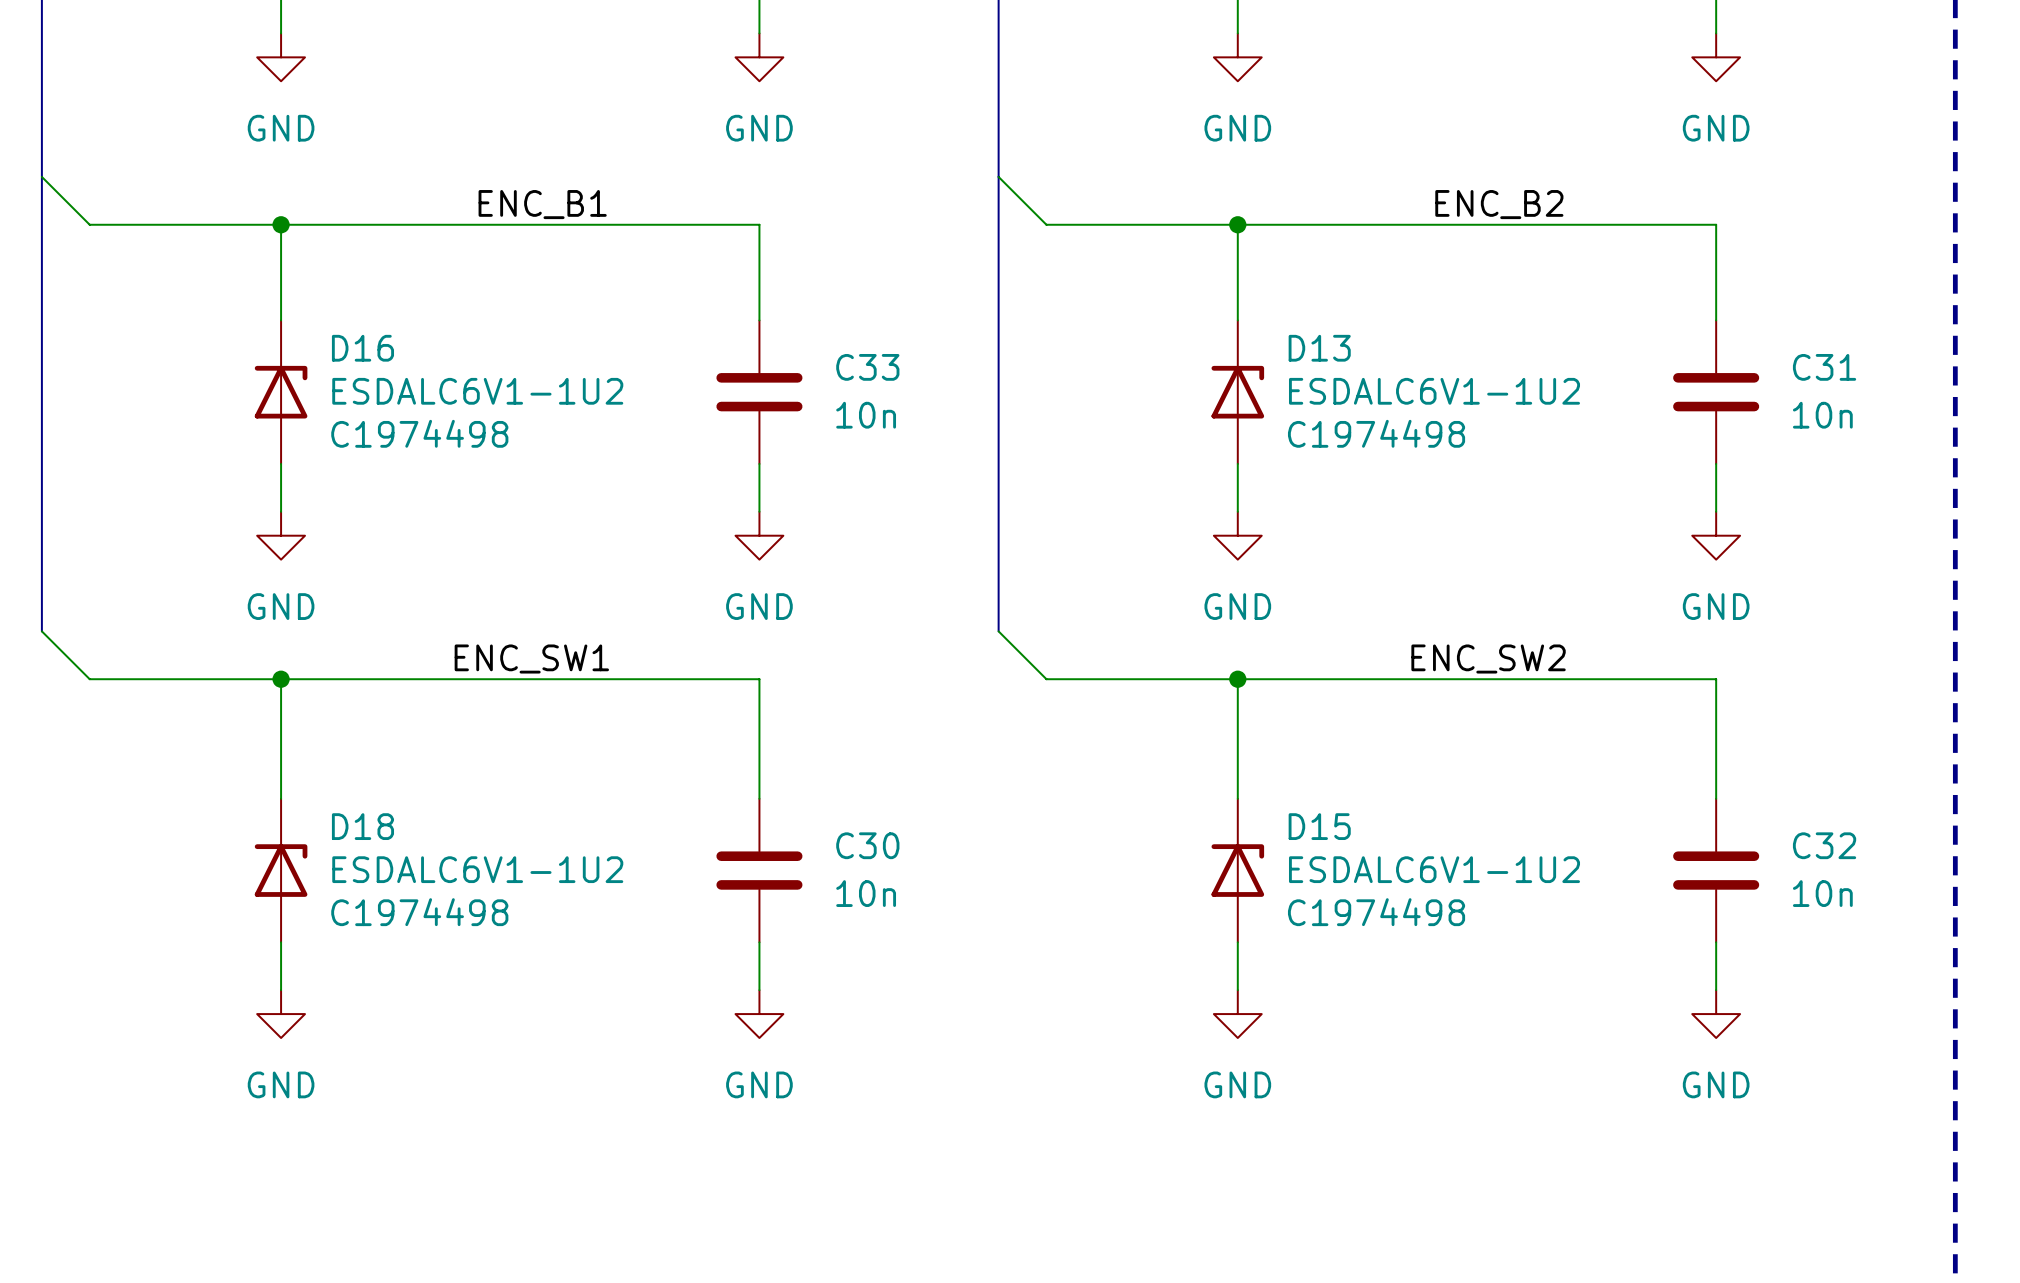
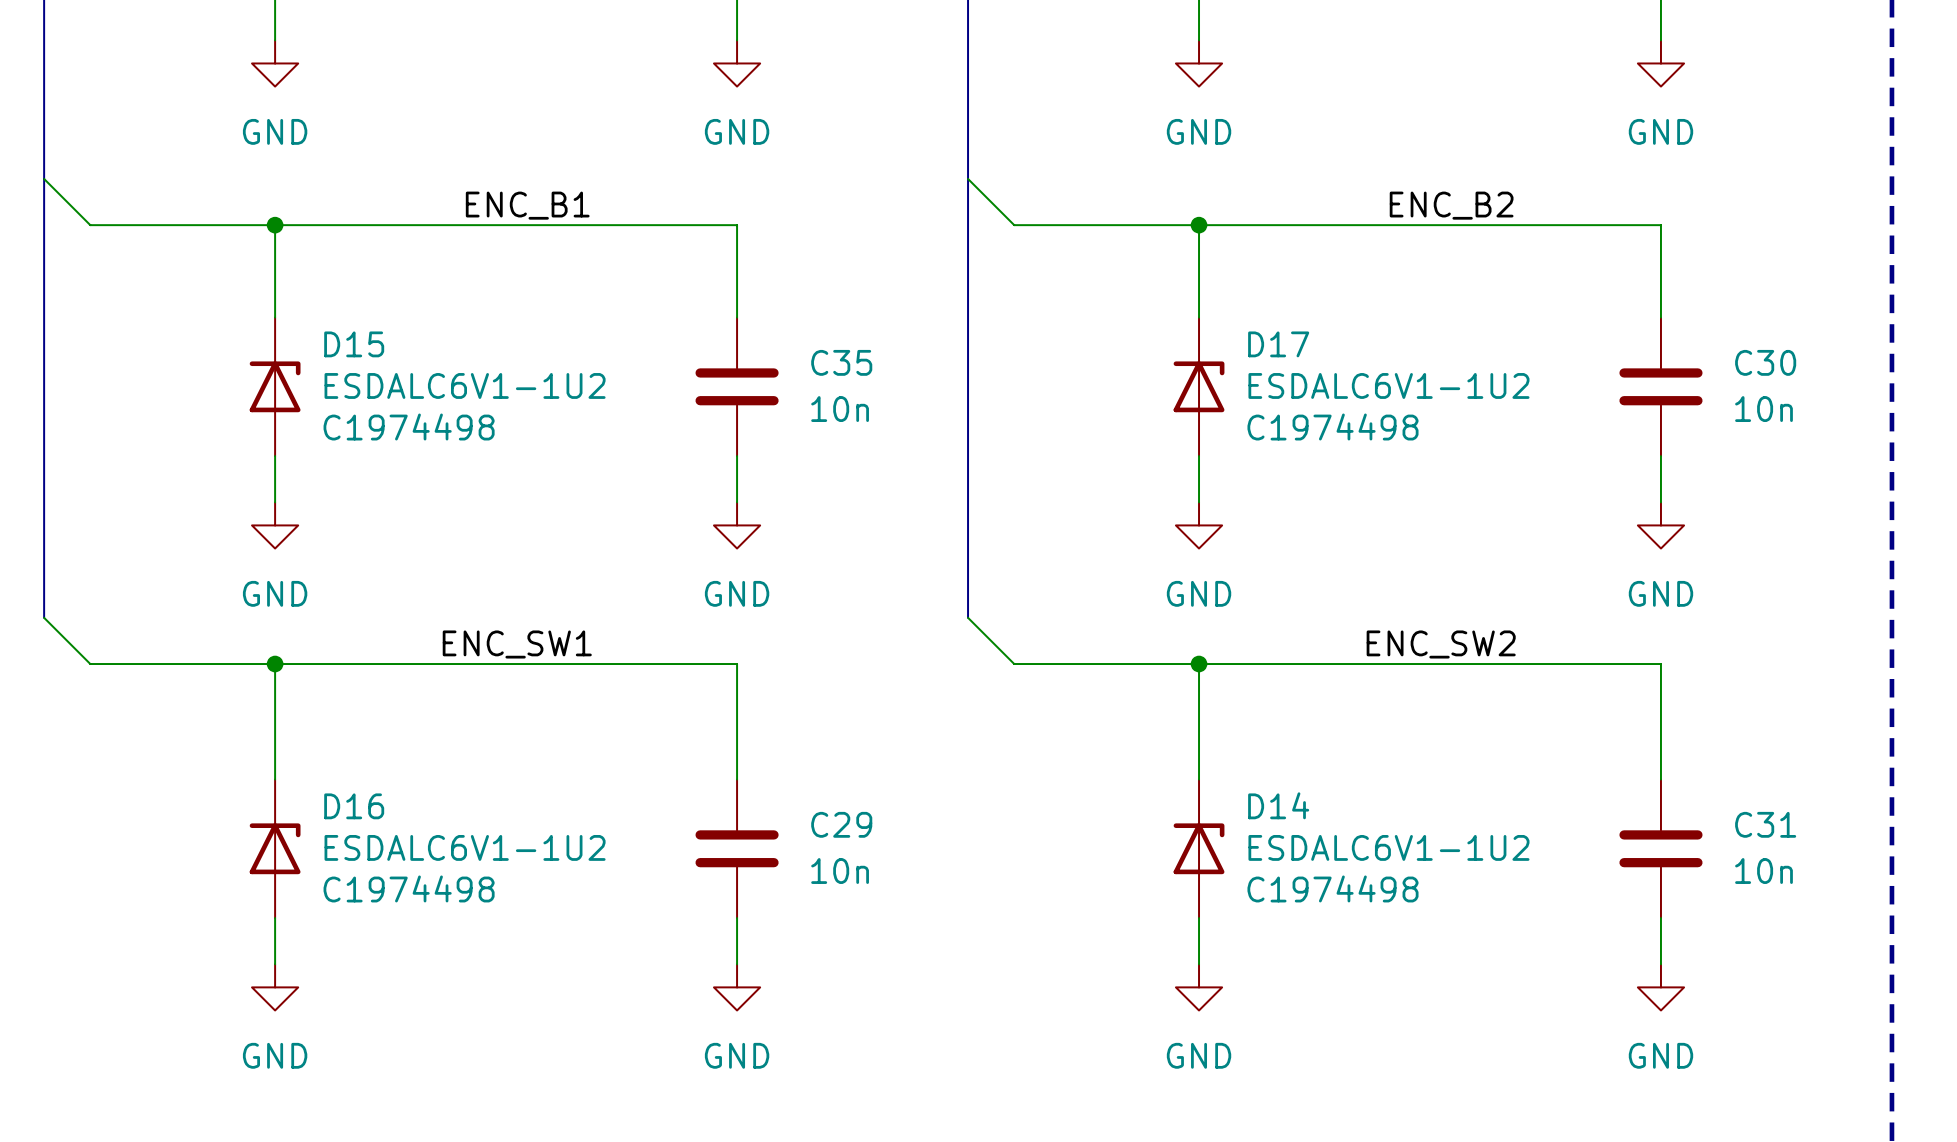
D16 name: D16 (362, 348) -> D15 (354, 344)
D13 name: D13 (1319, 348) -> D17 (1278, 344)
C33 name: C33 (867, 367) -> C35 (841, 362)
C31 name: C31 (1824, 367) -> C30 (1765, 362)
D18 name: D18 (362, 826) -> D16 (354, 806)
D15 name: D15 (1319, 826) -> D14 (1278, 805)
C30 name: C30 (867, 845) -> C29 (841, 824)
C32 name: C32 (1824, 845) -> C31 (1765, 824)

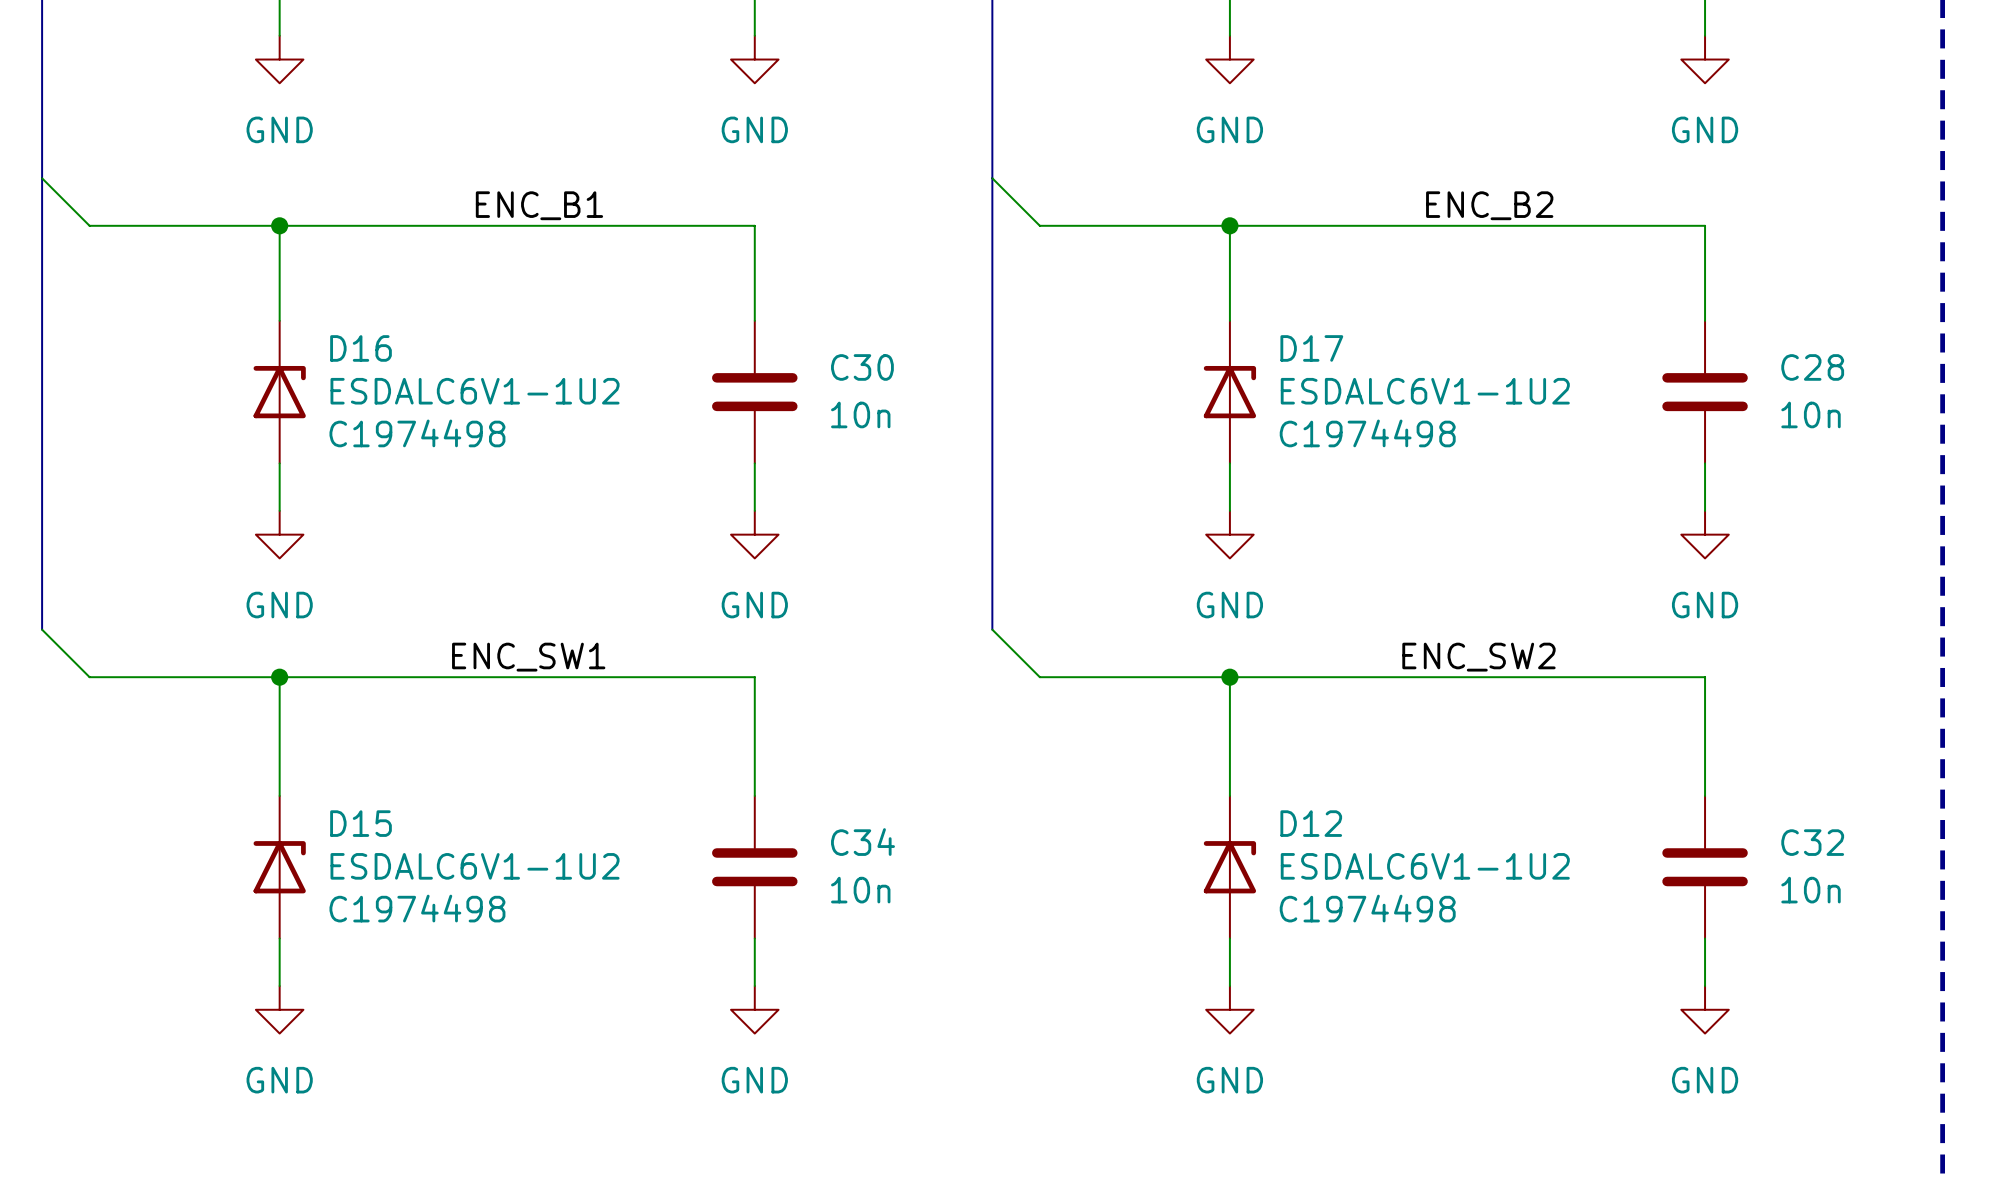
D15 name: D15 (354, 344) -> D16 (361, 348)
C35 name: C35 (841, 362) -> C30 (862, 367)
C30 name: C30 (1765, 362) -> C28 (1812, 367)
D14 name: D14 (1278, 805) -> D12 (1311, 823)
D16 name: D16 (354, 806) -> D15 (361, 823)
C29 name: C29 (841, 824) -> C34 (863, 842)
C31 name: C31 (1765, 824) -> C32 (1812, 842)

